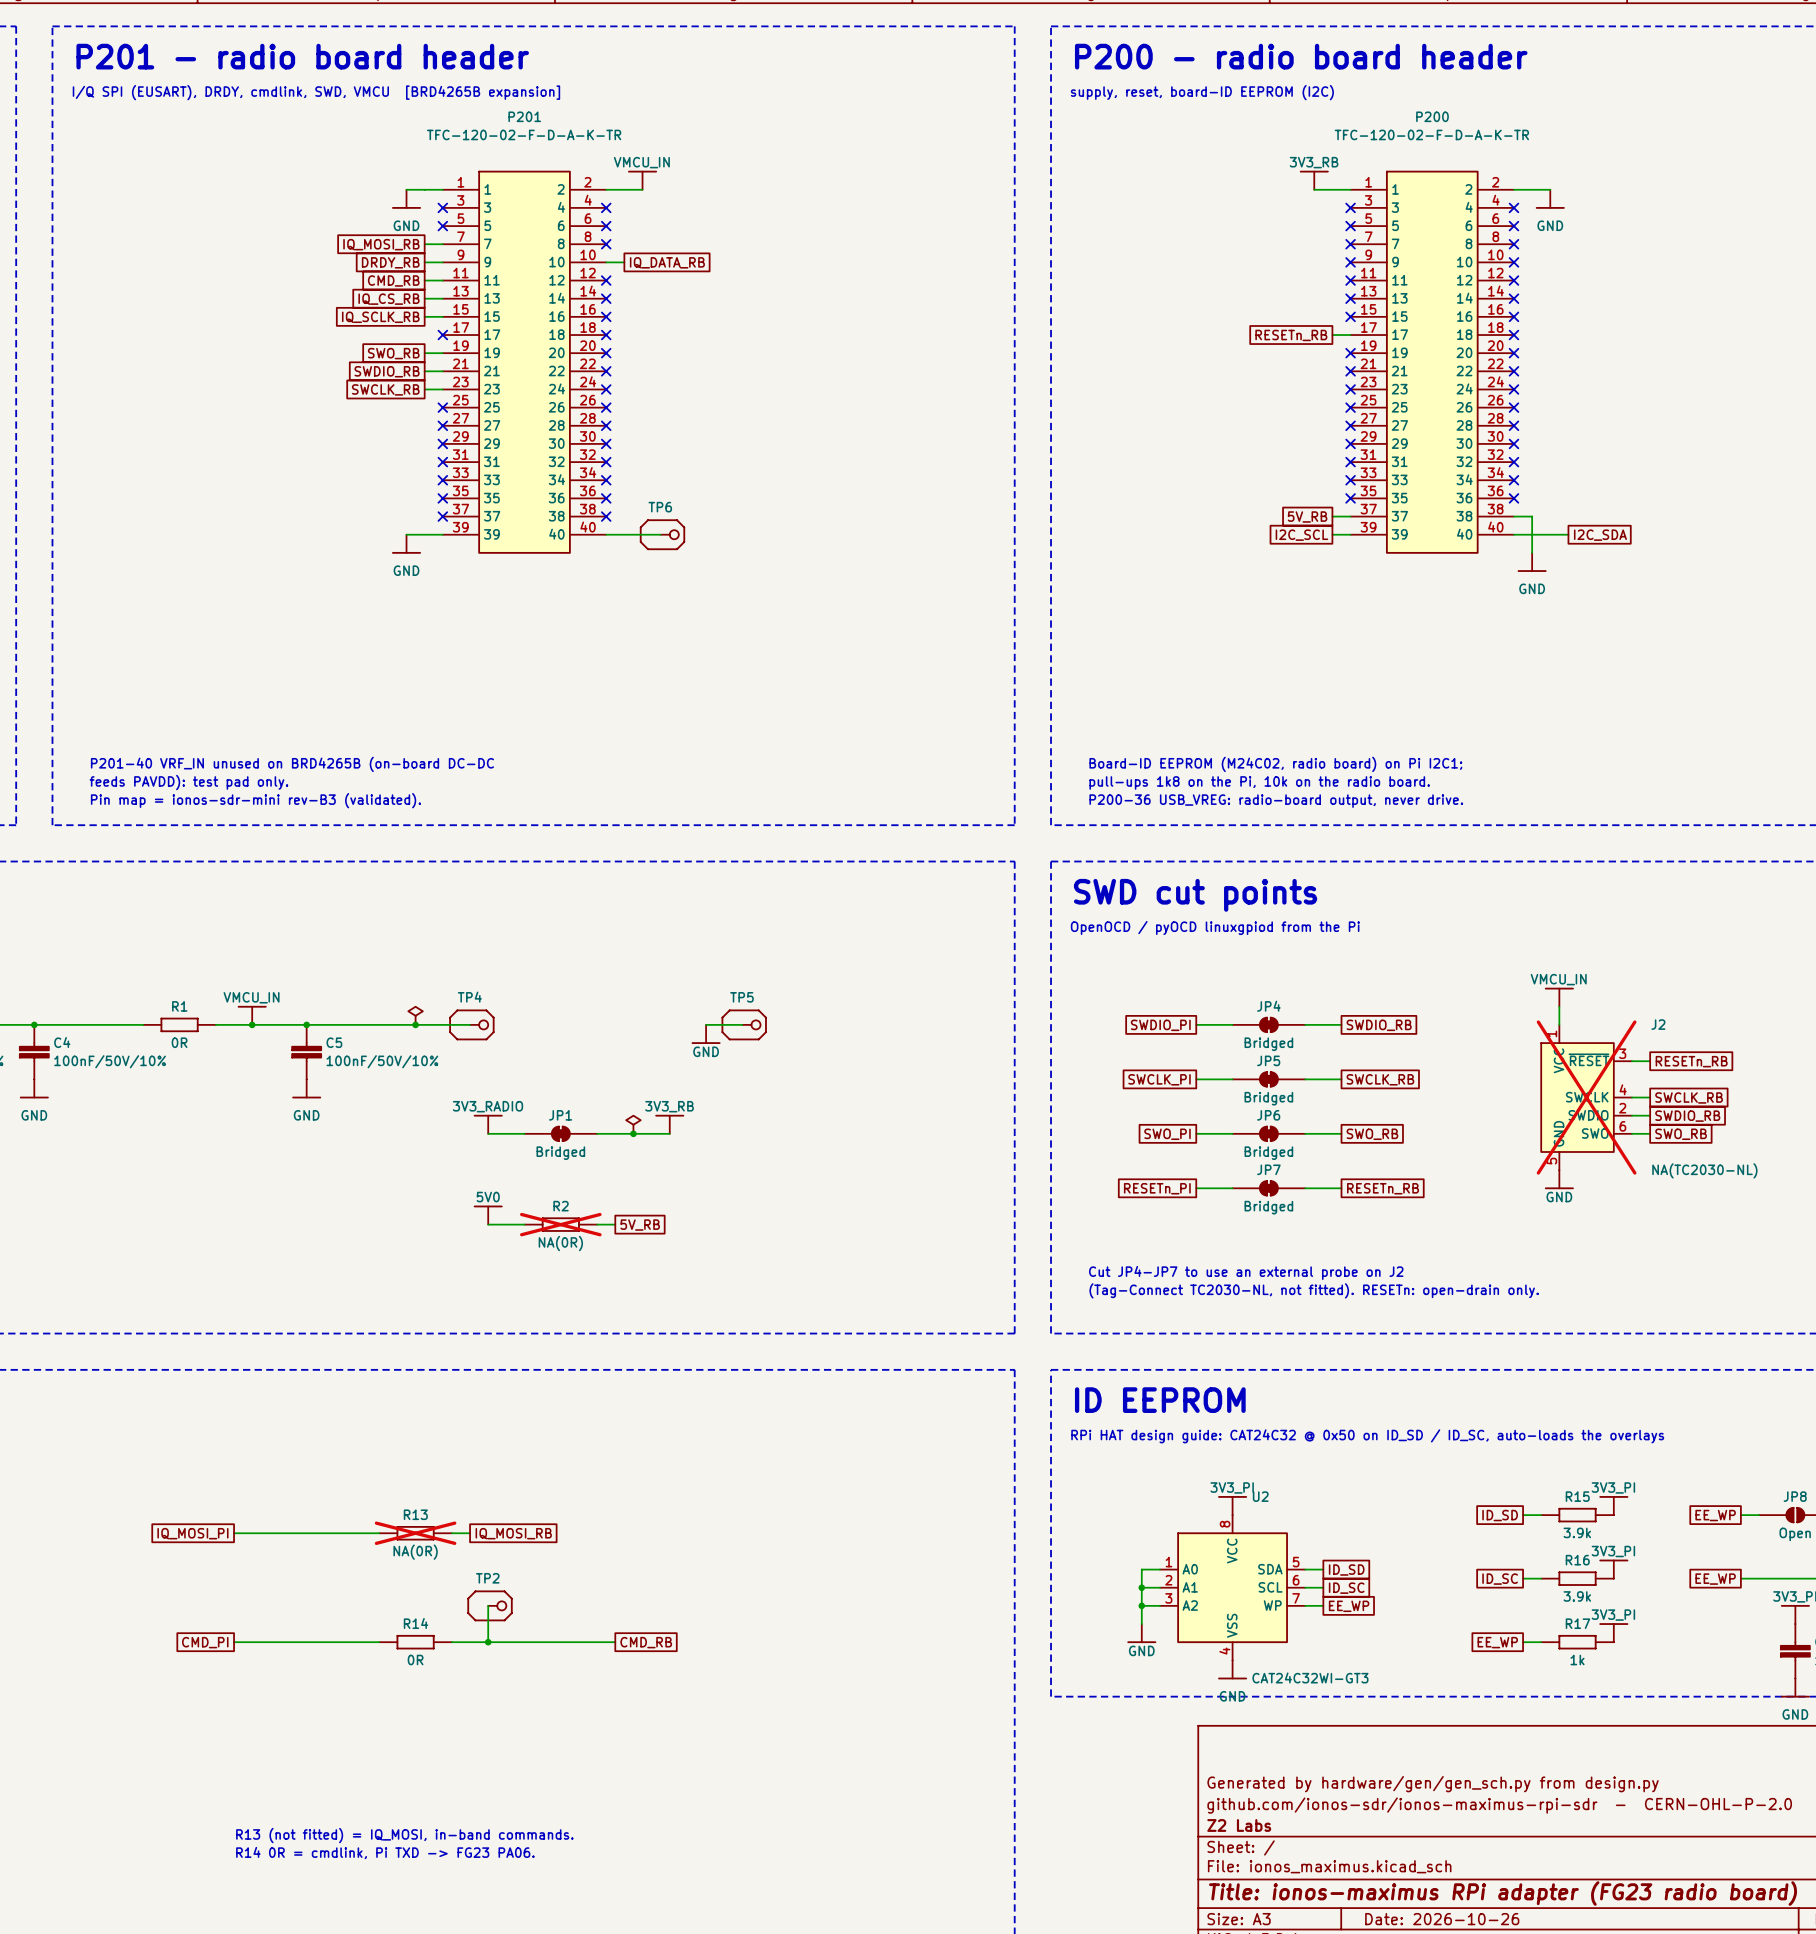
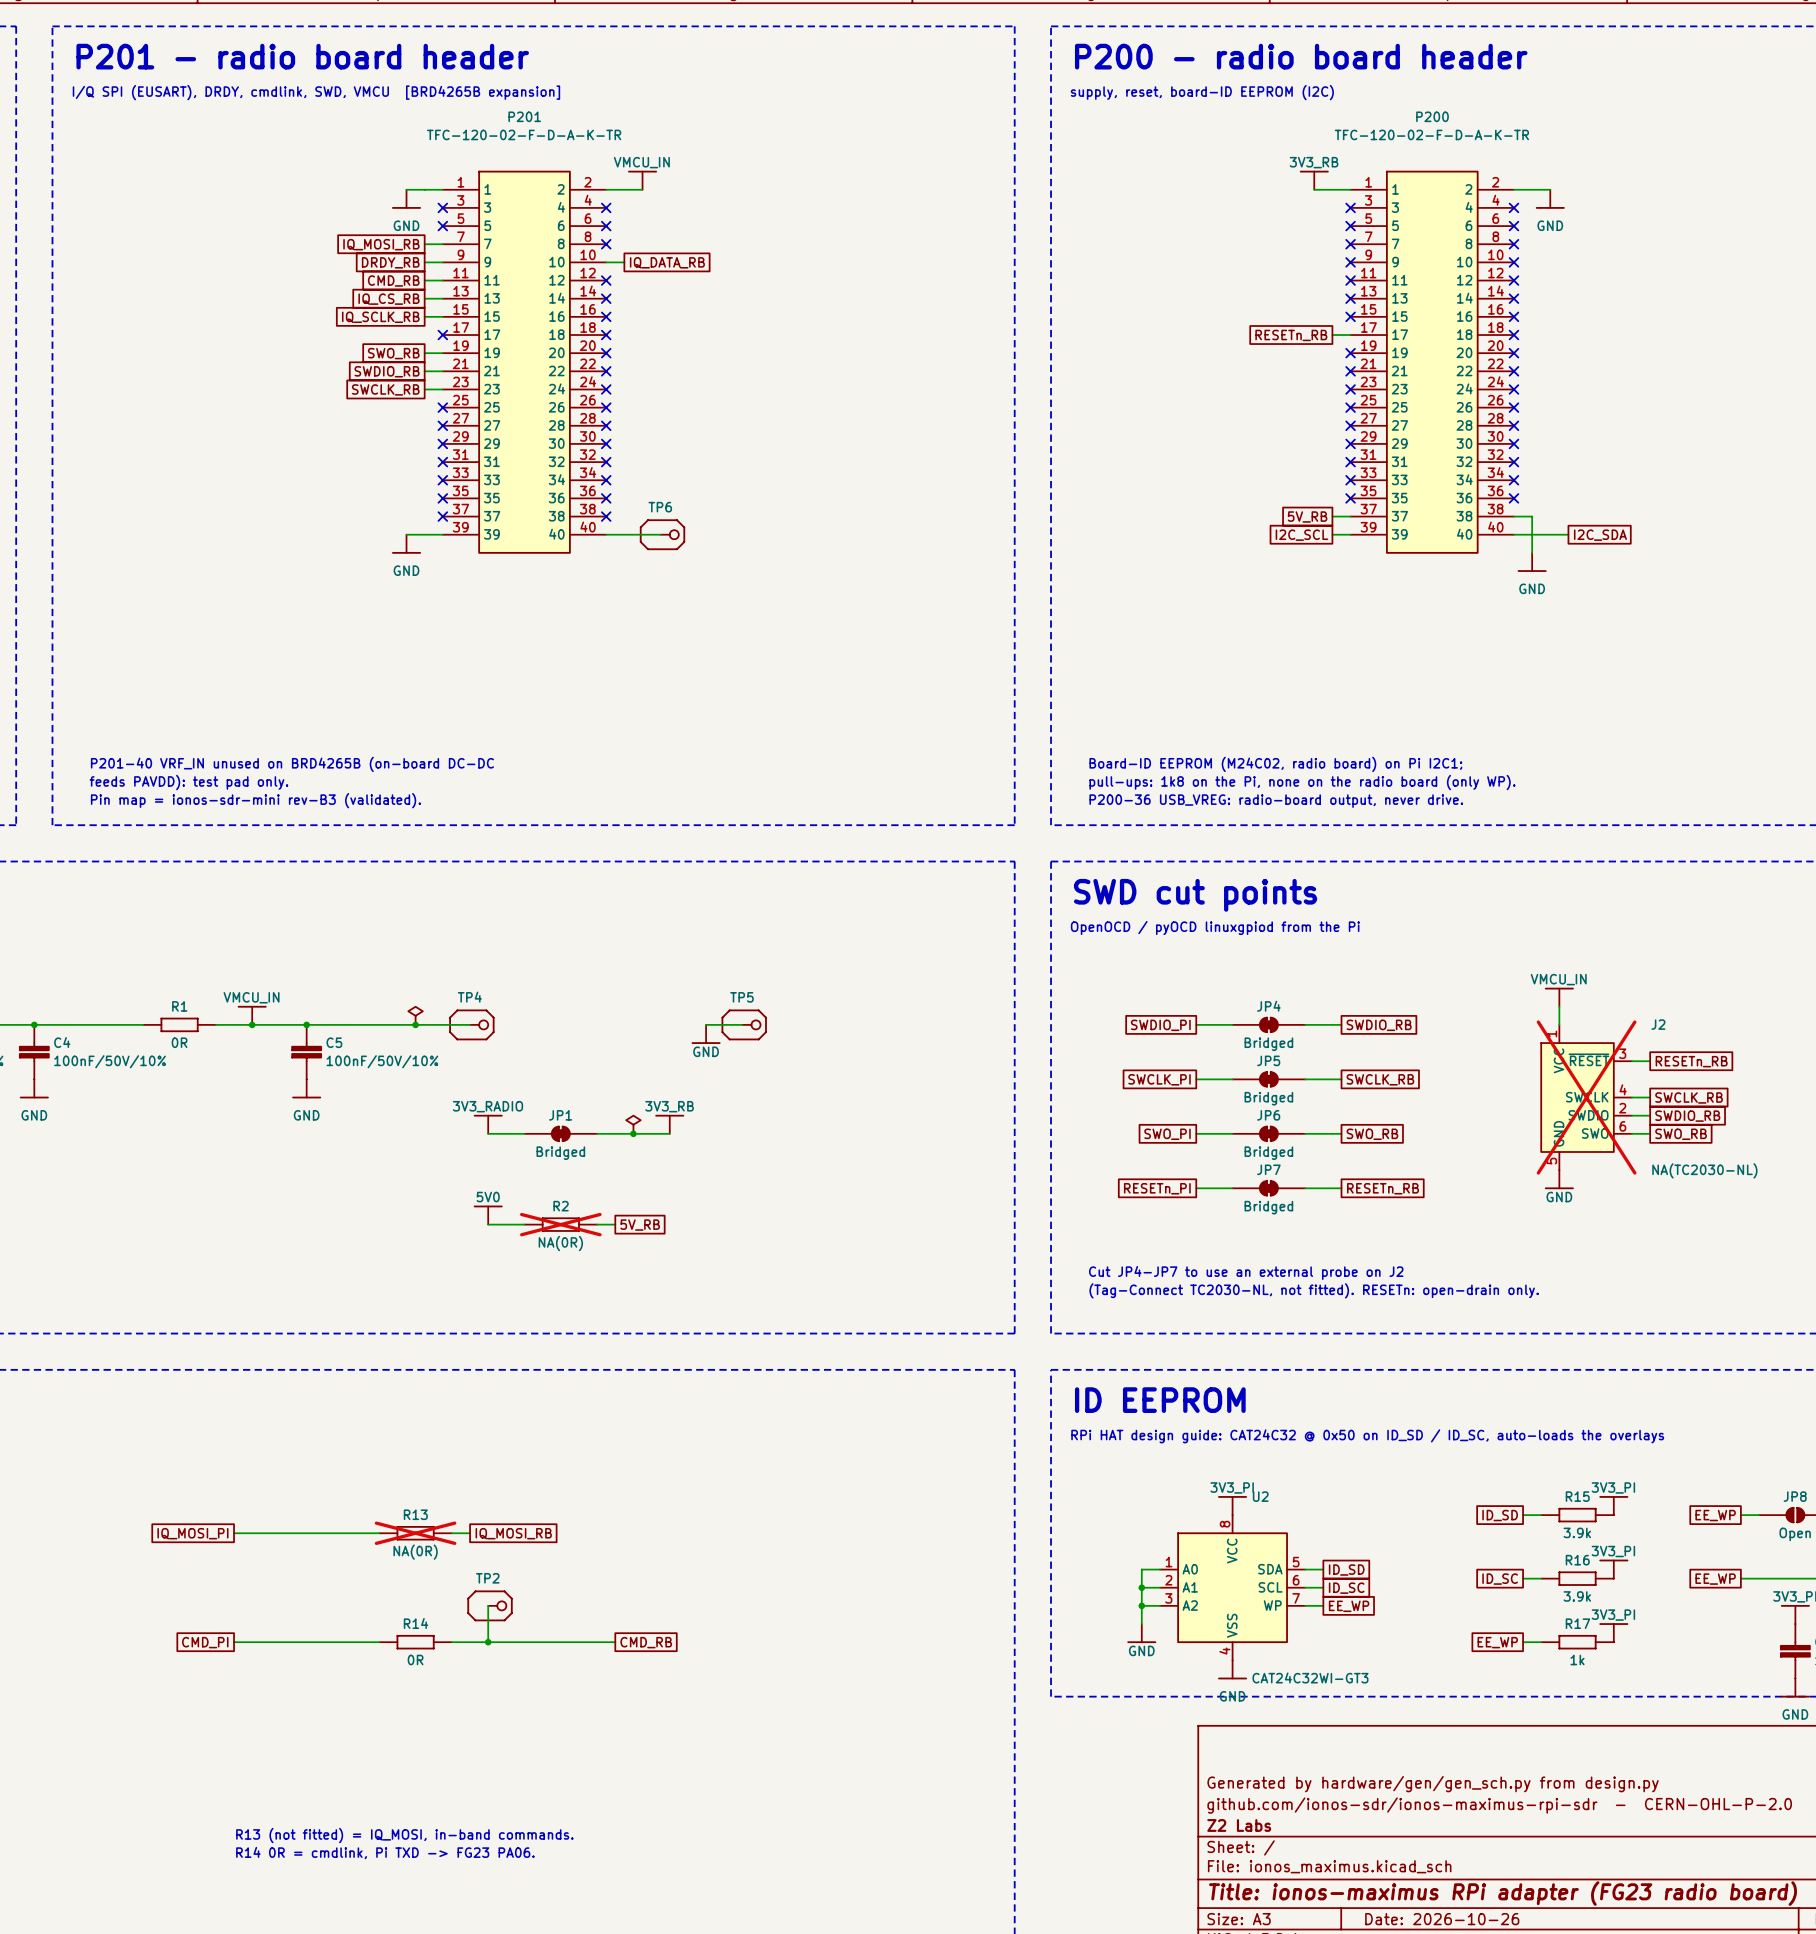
text: pull-ups 1k8 on the Pi, 10k on the radio board. (1259, 782) -> pull-ups: 1k8 on the Pi, none on the radio board (only WP). (1302, 782)

